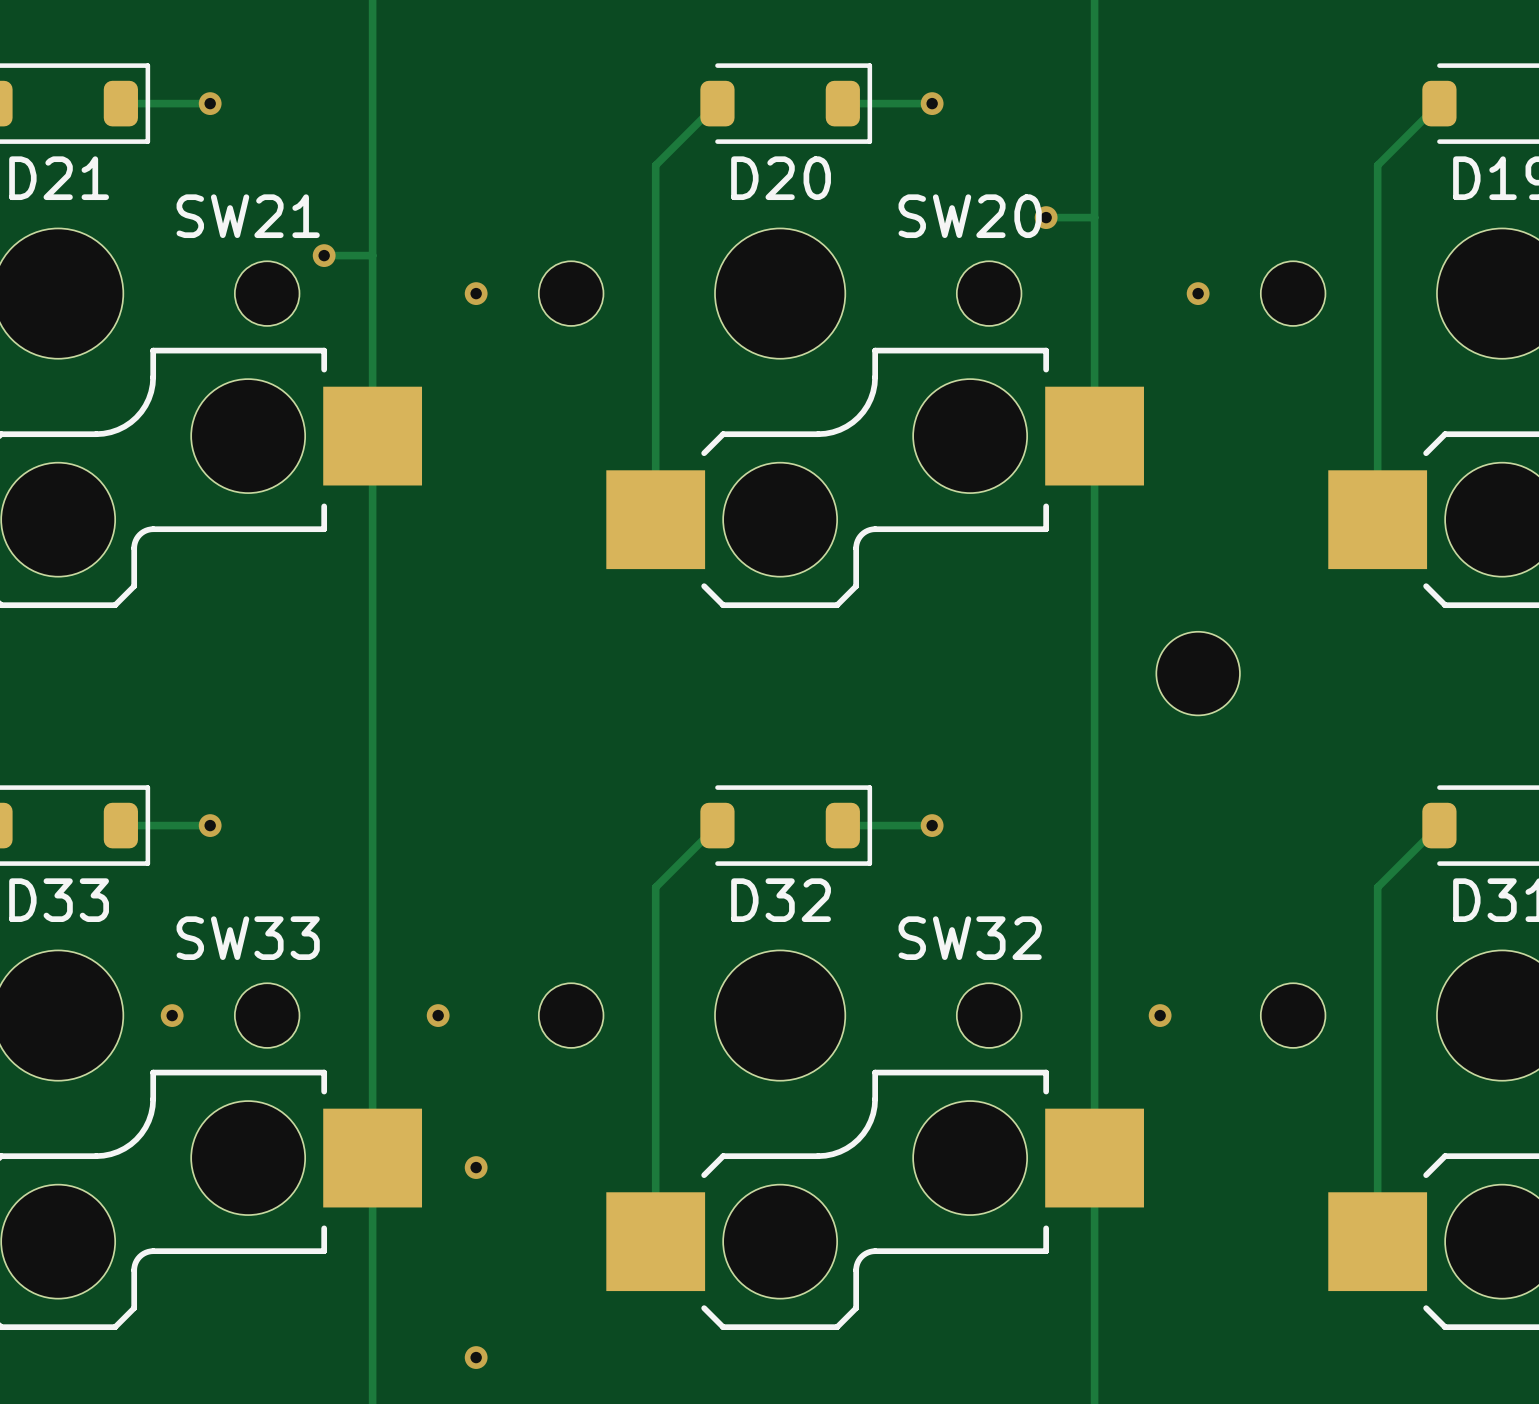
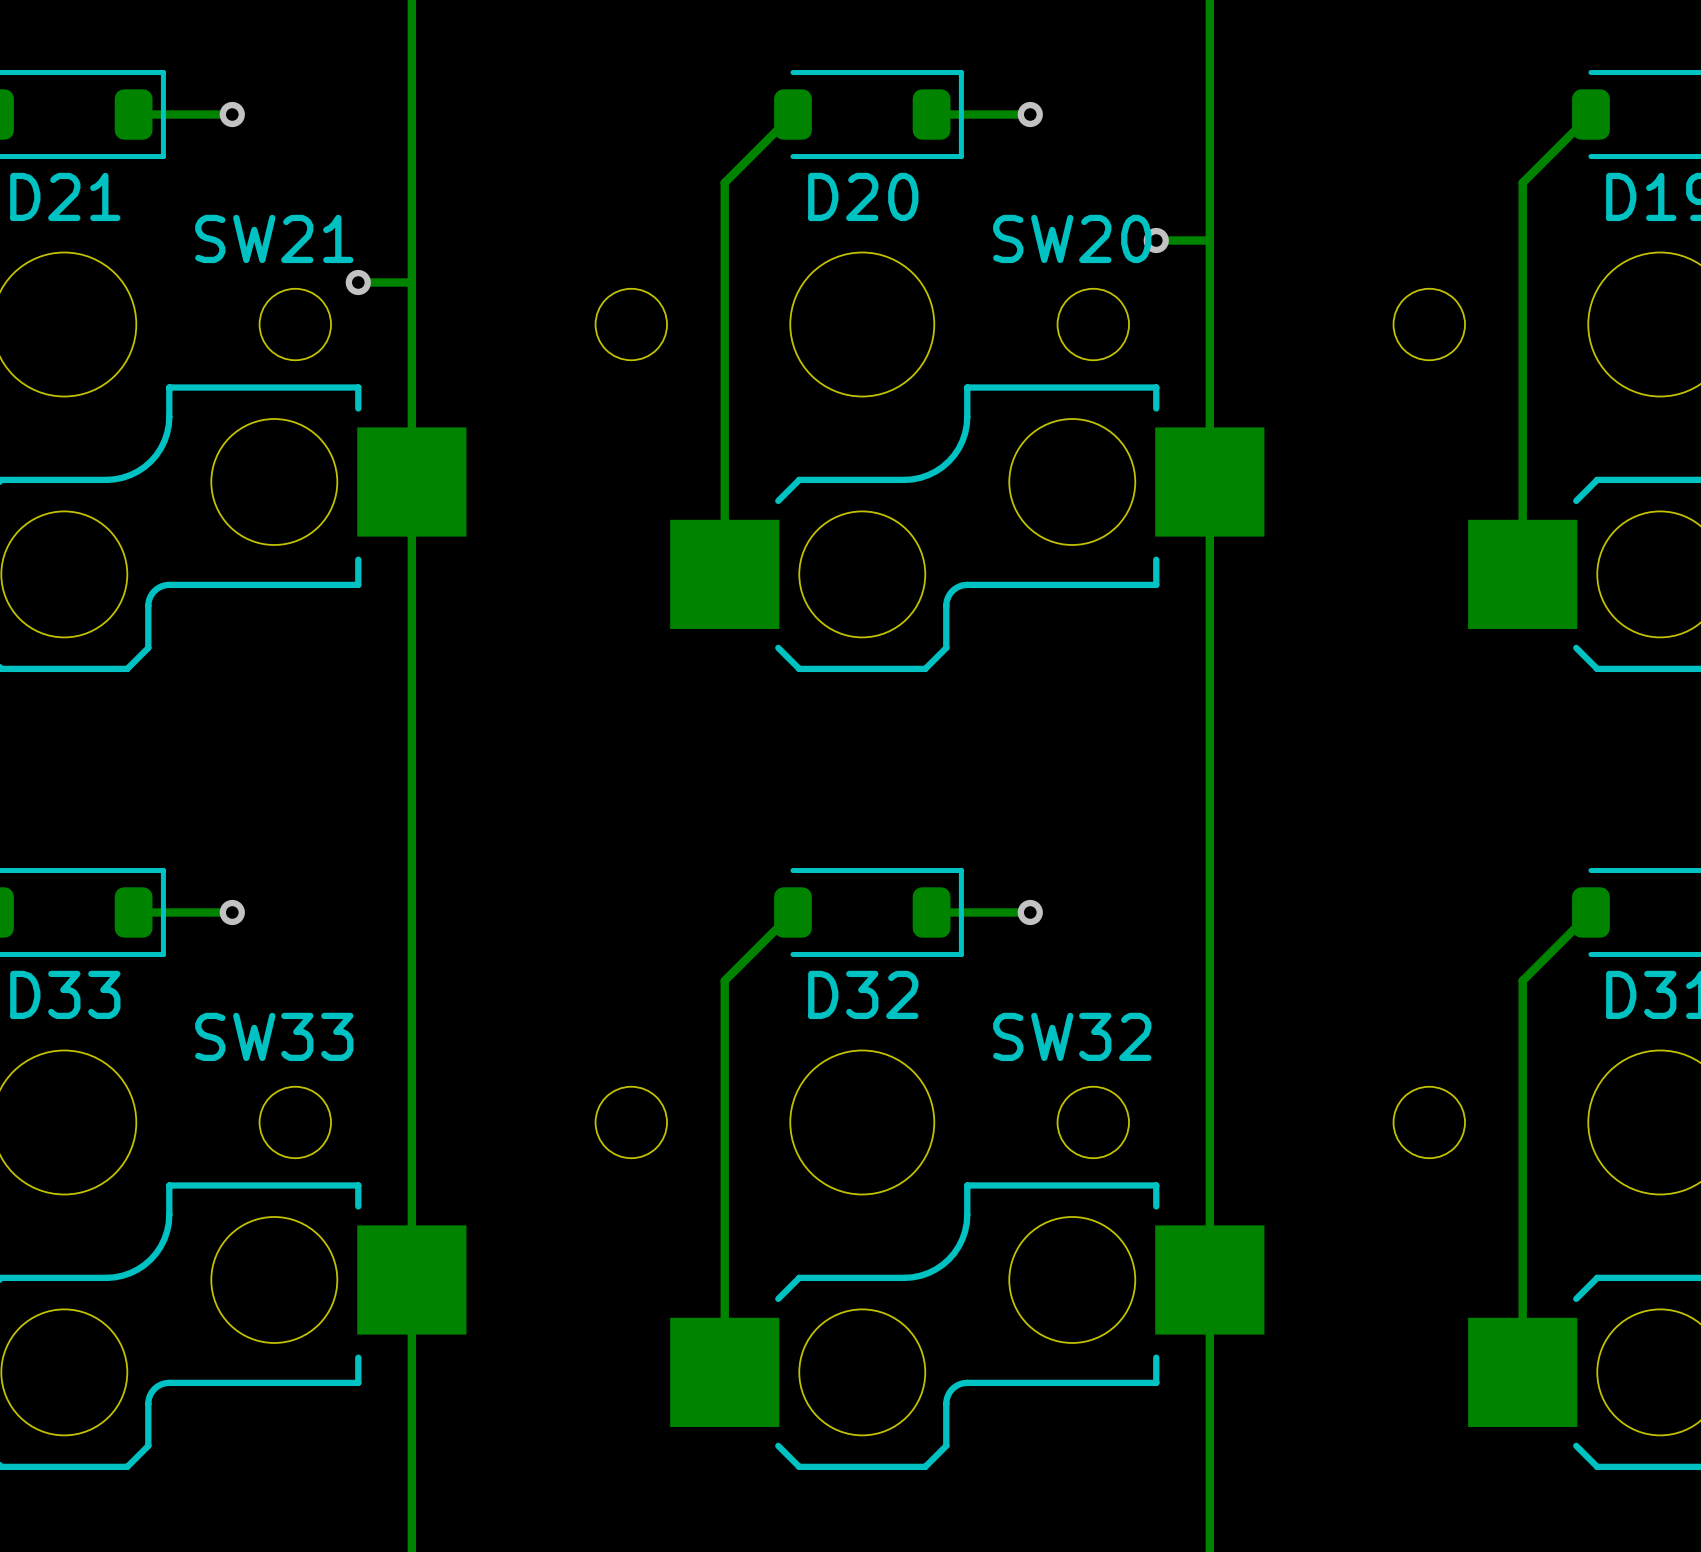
via: (476, 293) -> none
via: (1198, 293) -> none
part: (1198, 673) -> none
via: (172, 1015) -> none
via: (438, 1015) -> none
via: (1160, 1015) -> none
via: (476, 1167) -> none
via: (476, 1357) -> none

